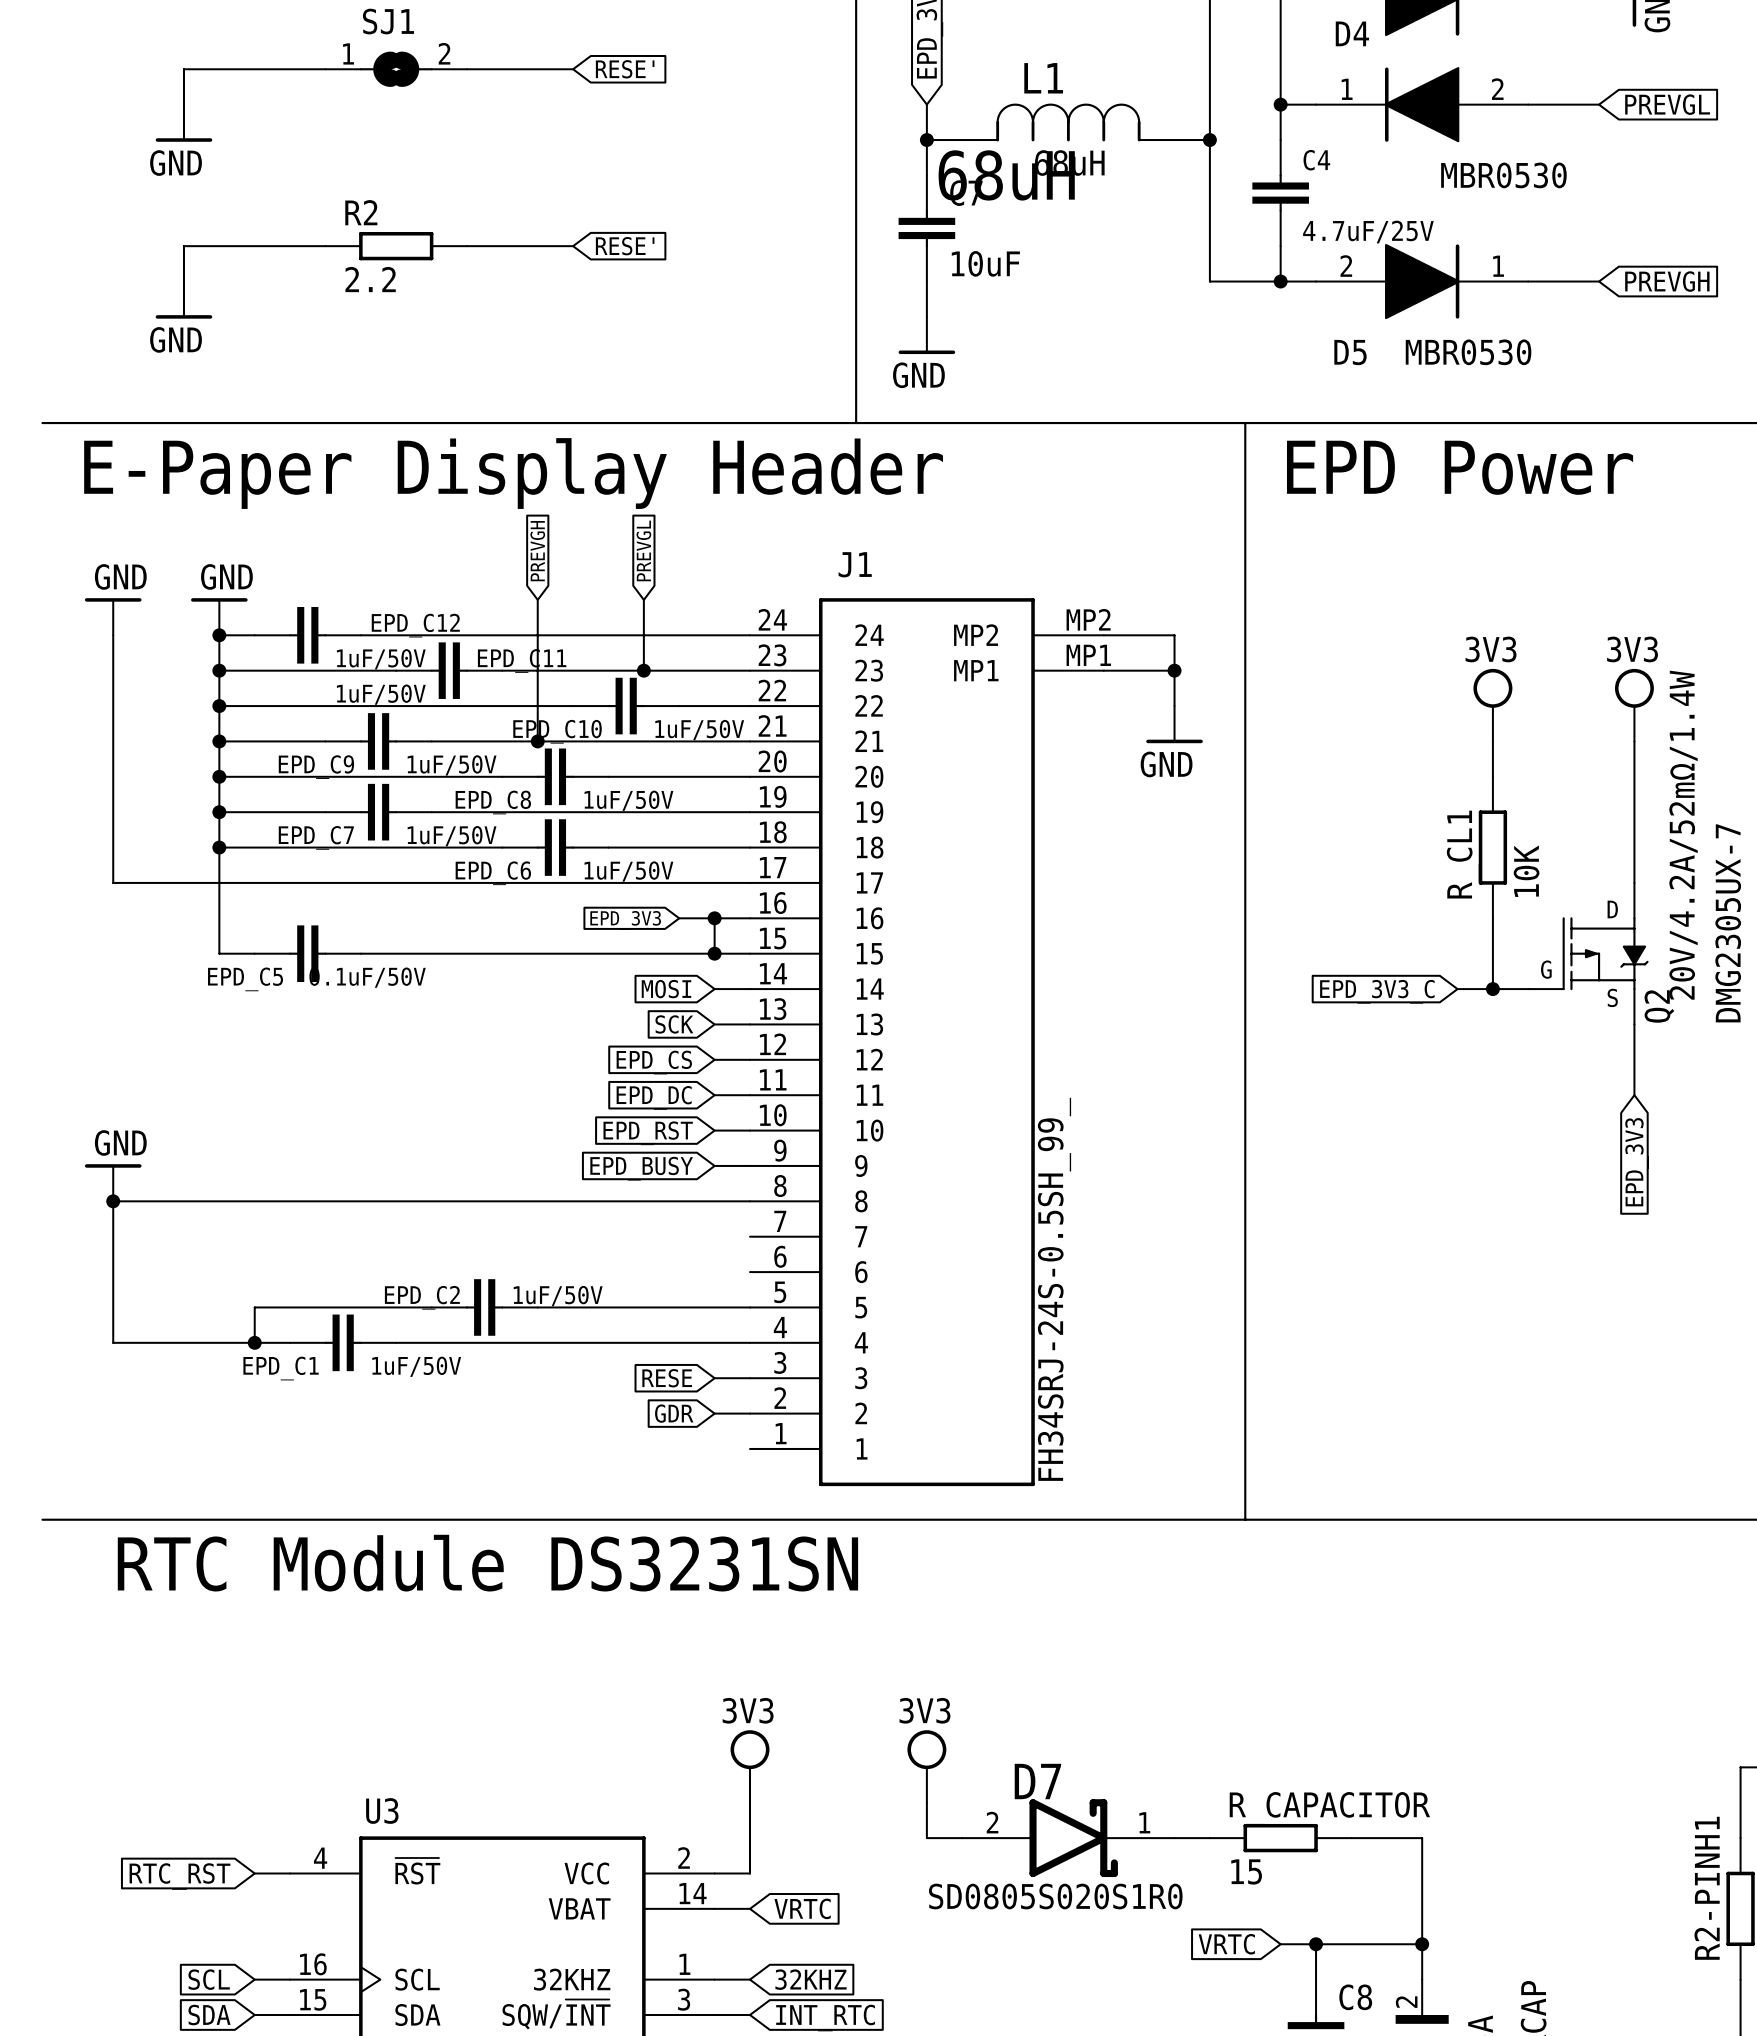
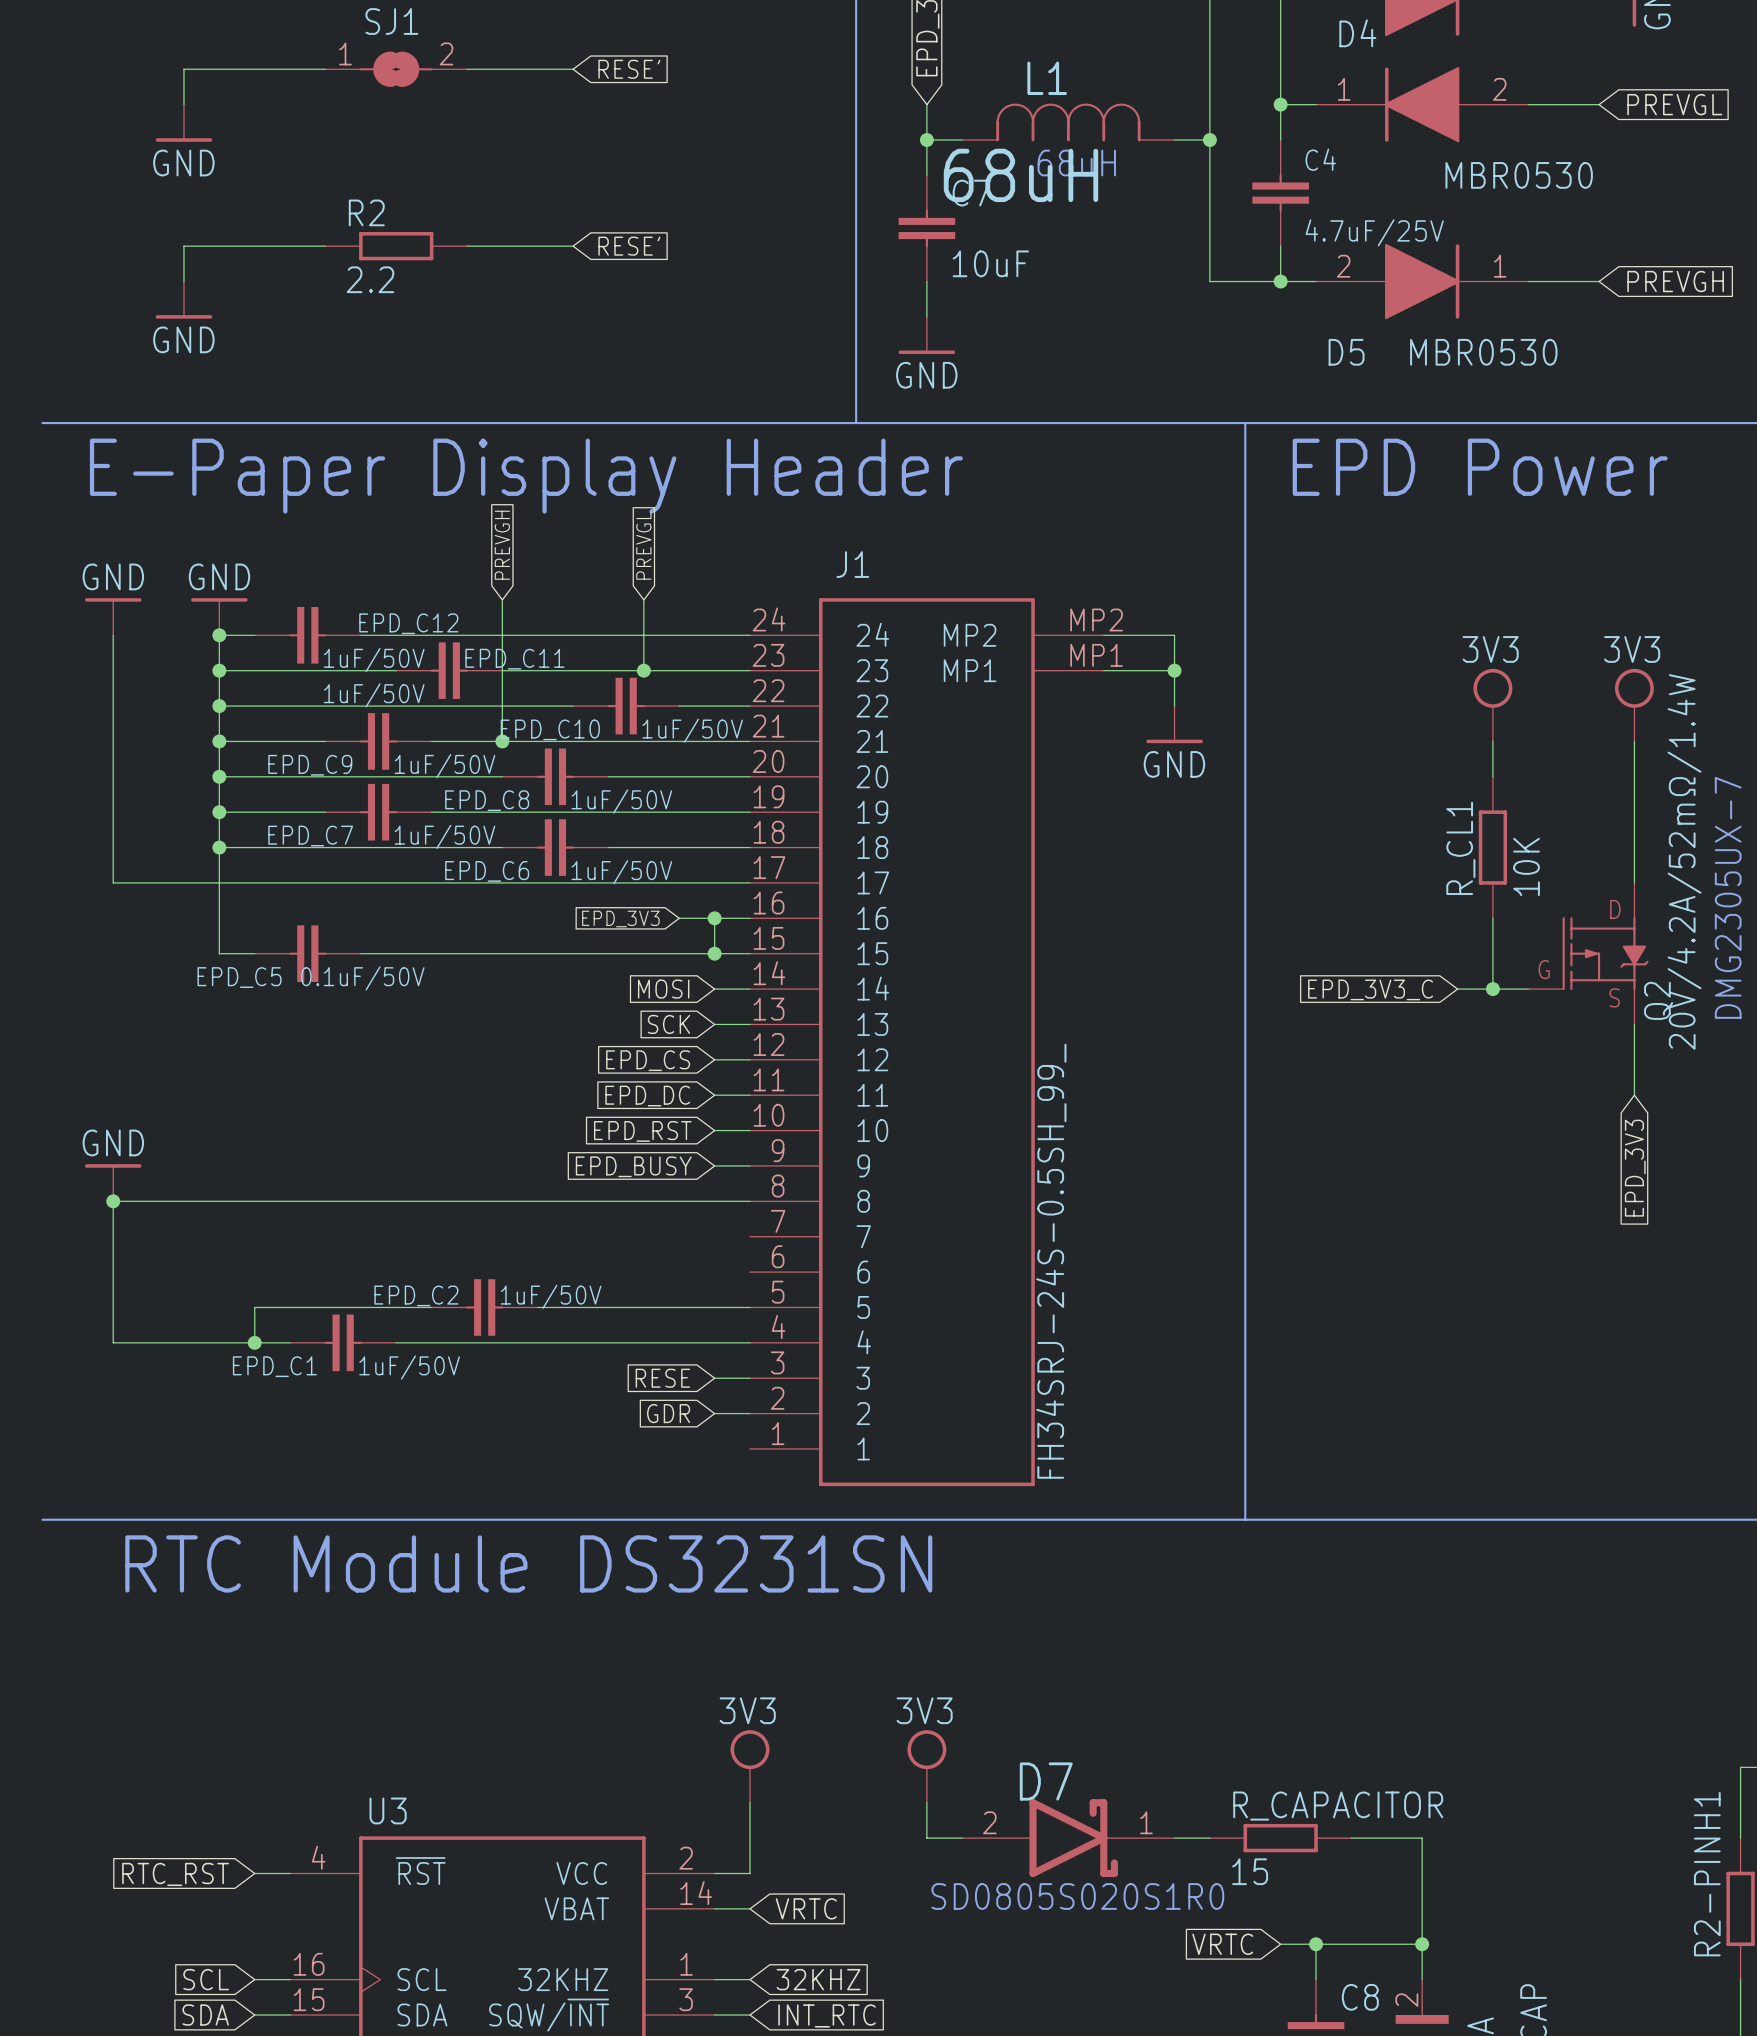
global label position: PREVGH (537, 551) -> PREVGH (502, 545)
wire: (537, 599) (537, 741) -> (502, 599) (502, 741)
junction position: (537, 741) -> (502, 741)

